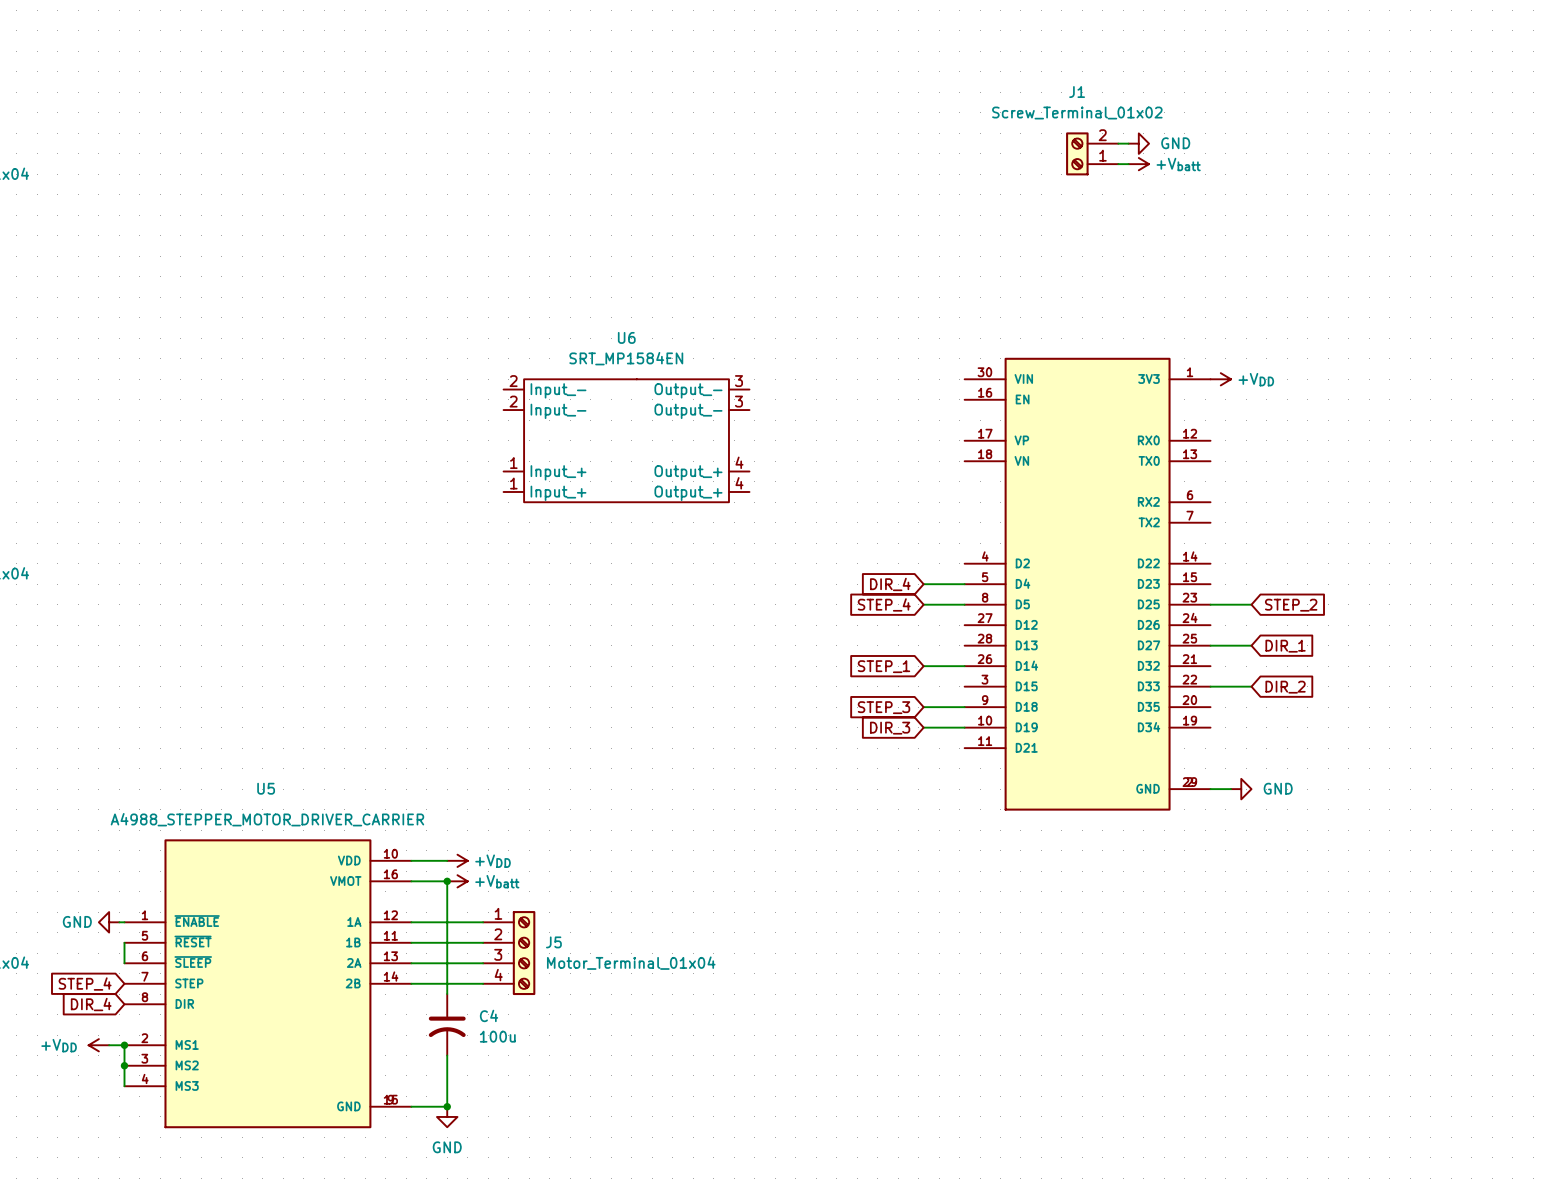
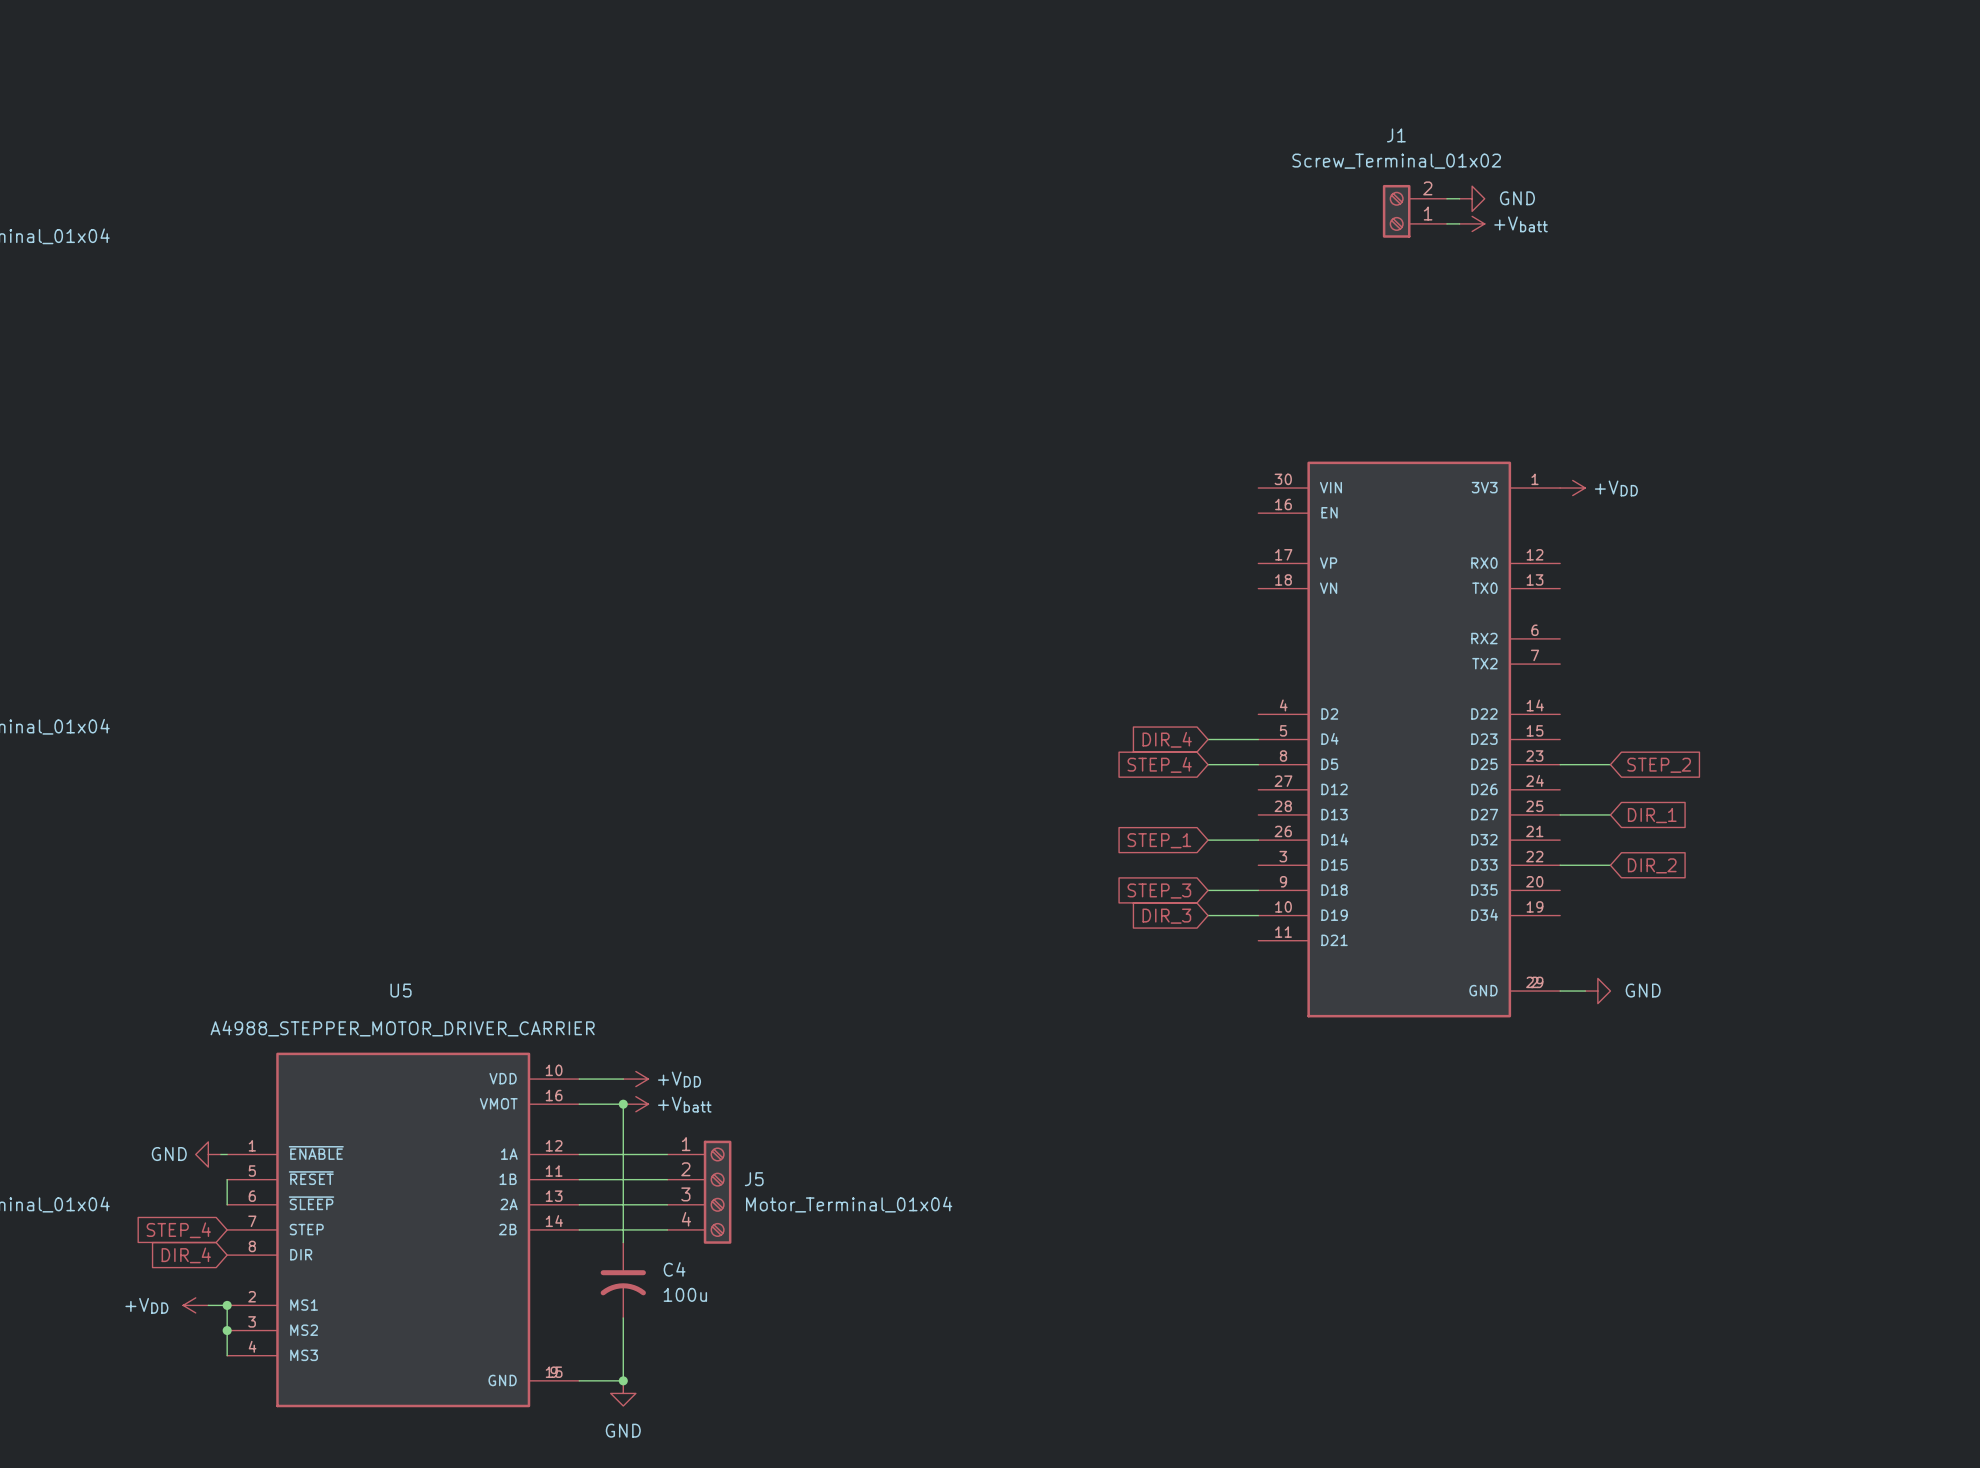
U6: SRT_MP1584EN (626, 440) -> none

